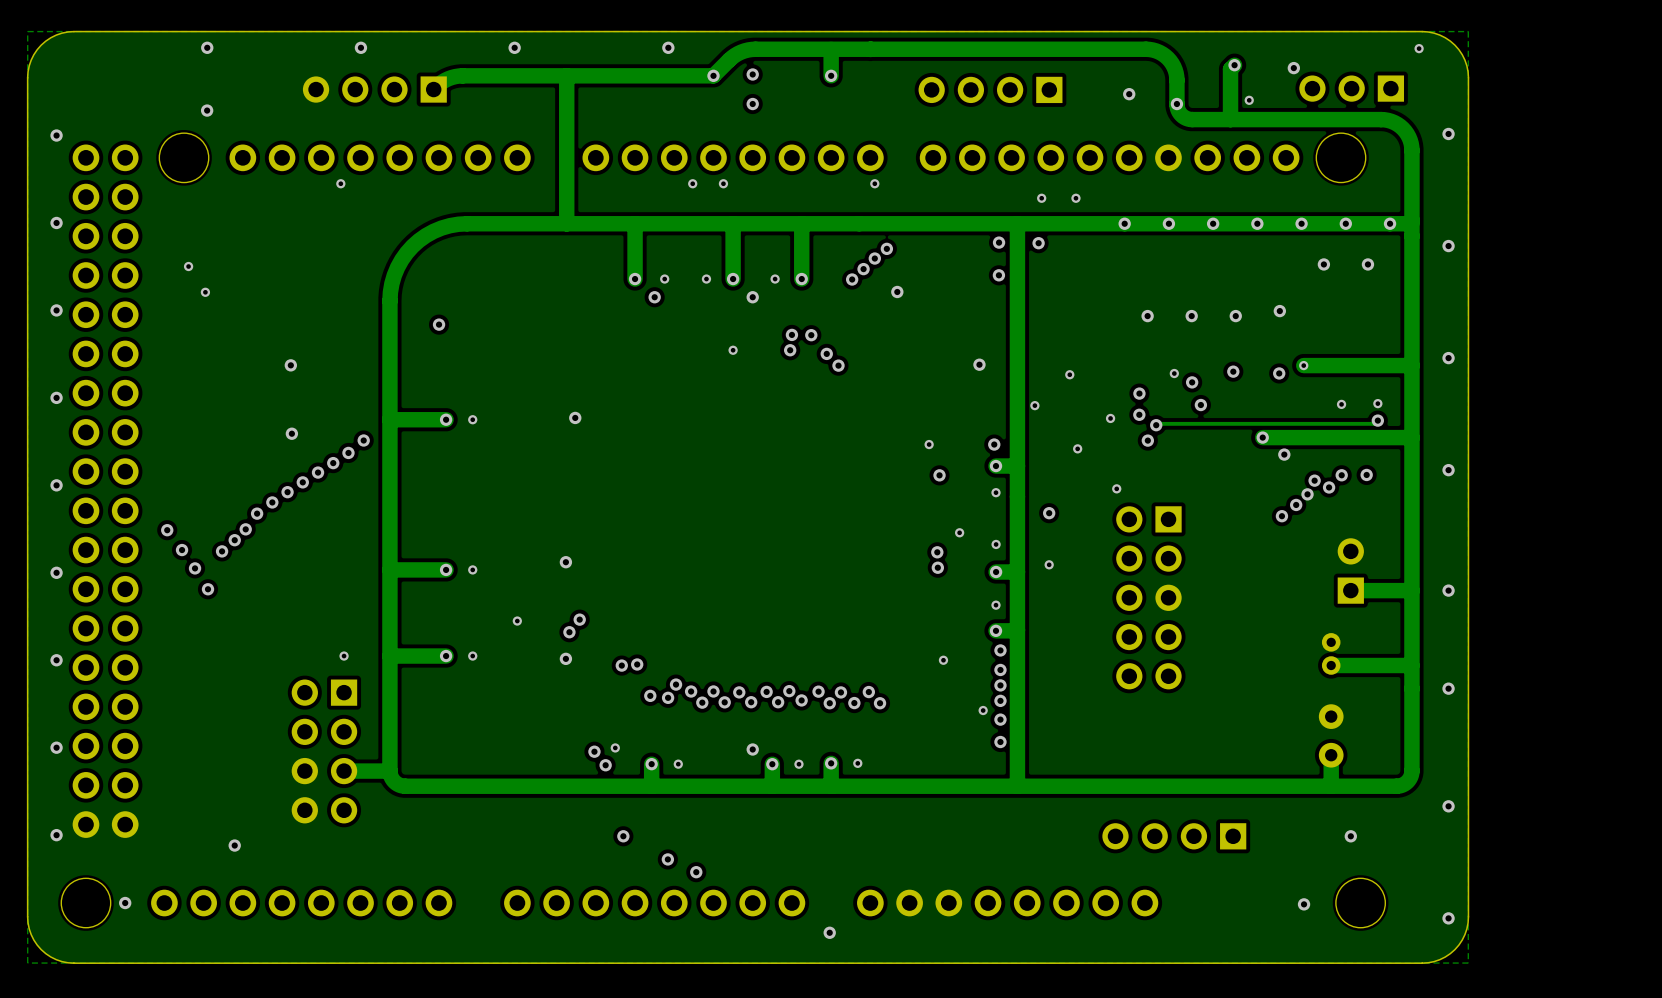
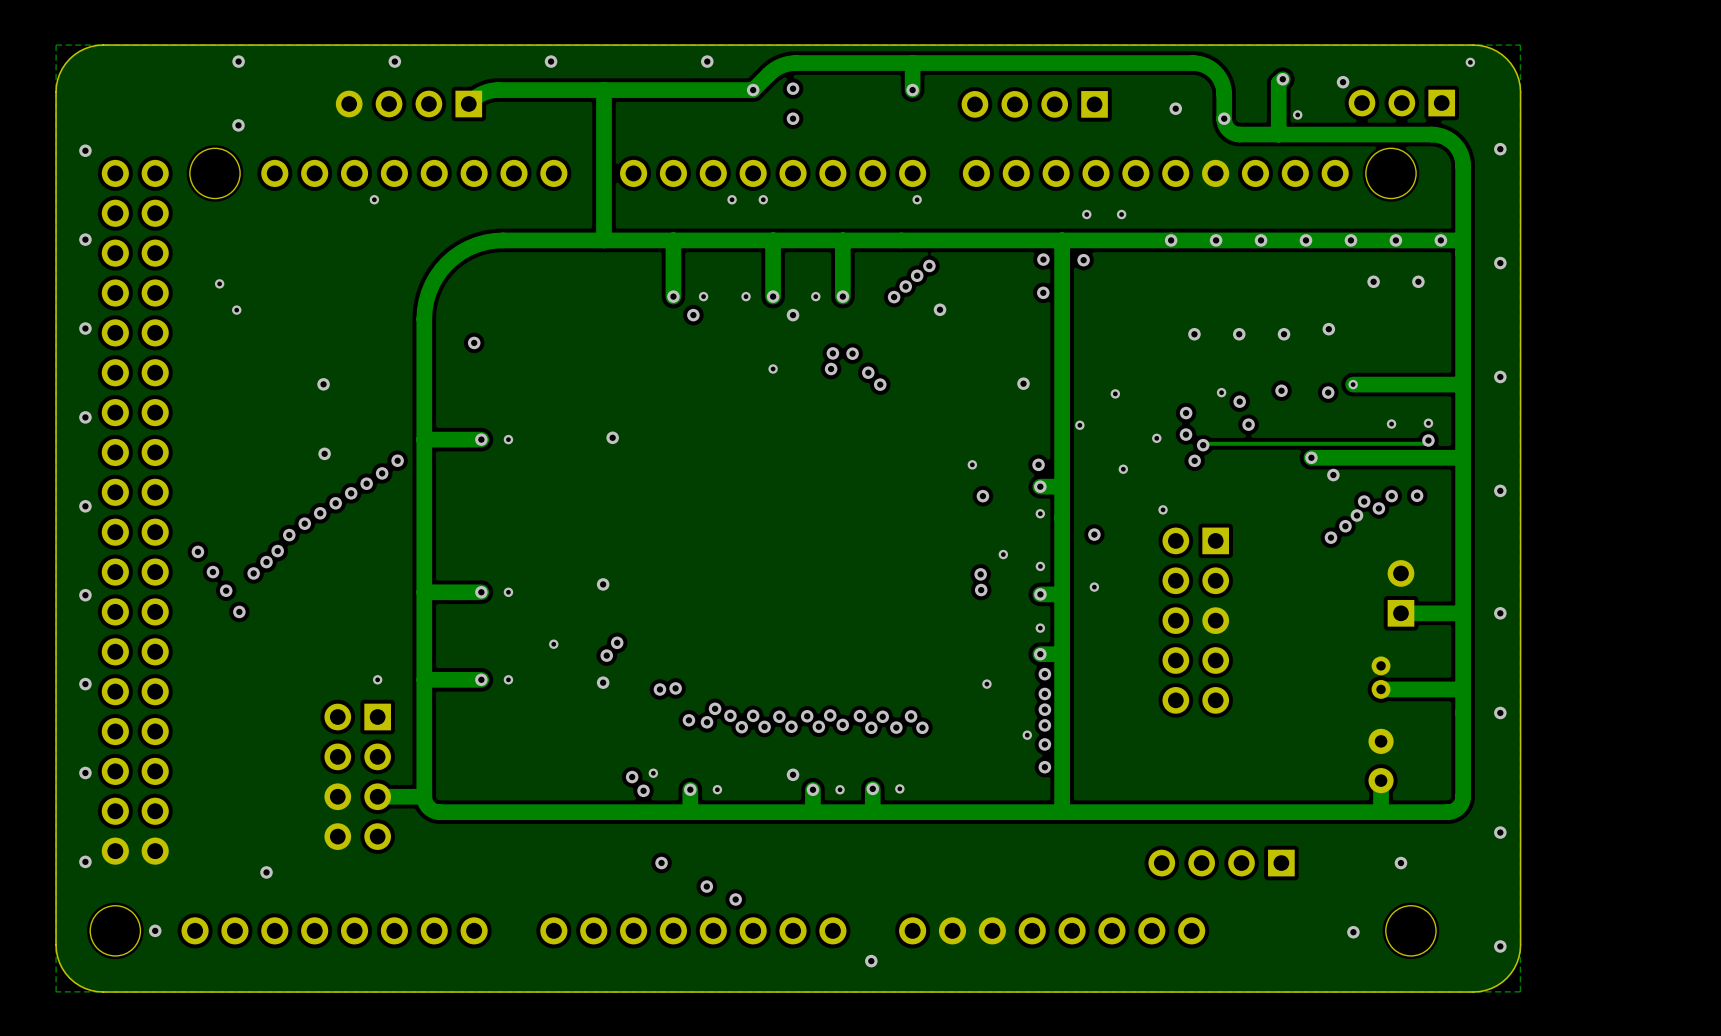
track: (831, 49) (831, 75) -> (912, 63) (912, 90)
via position: (831, 75) -> (912, 90)

